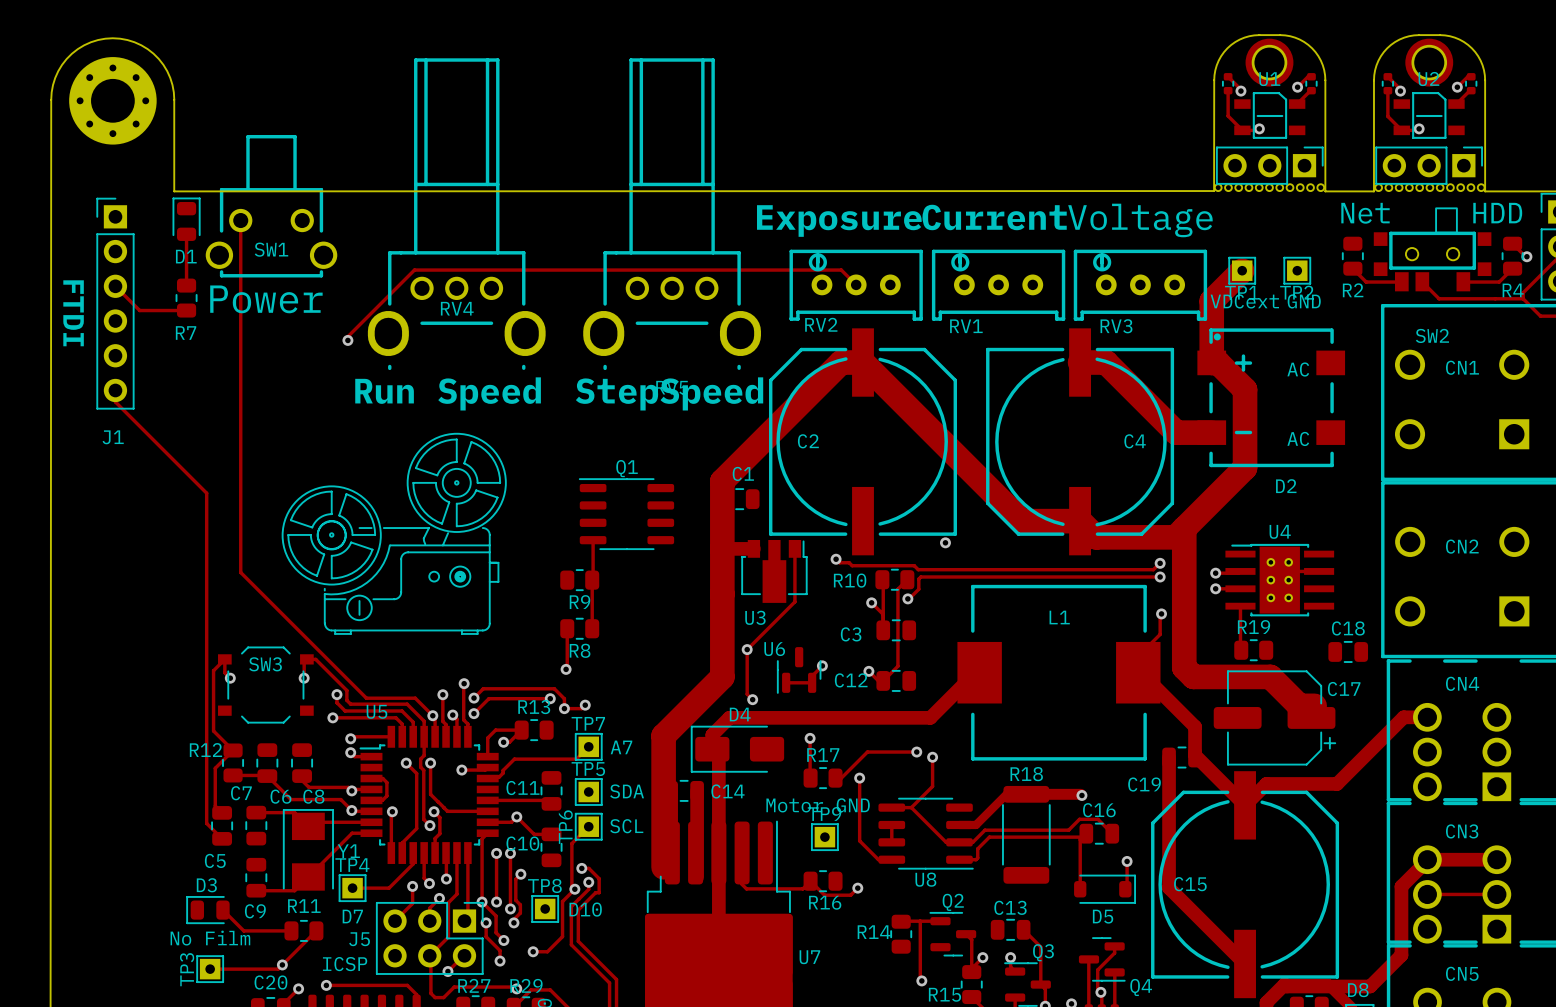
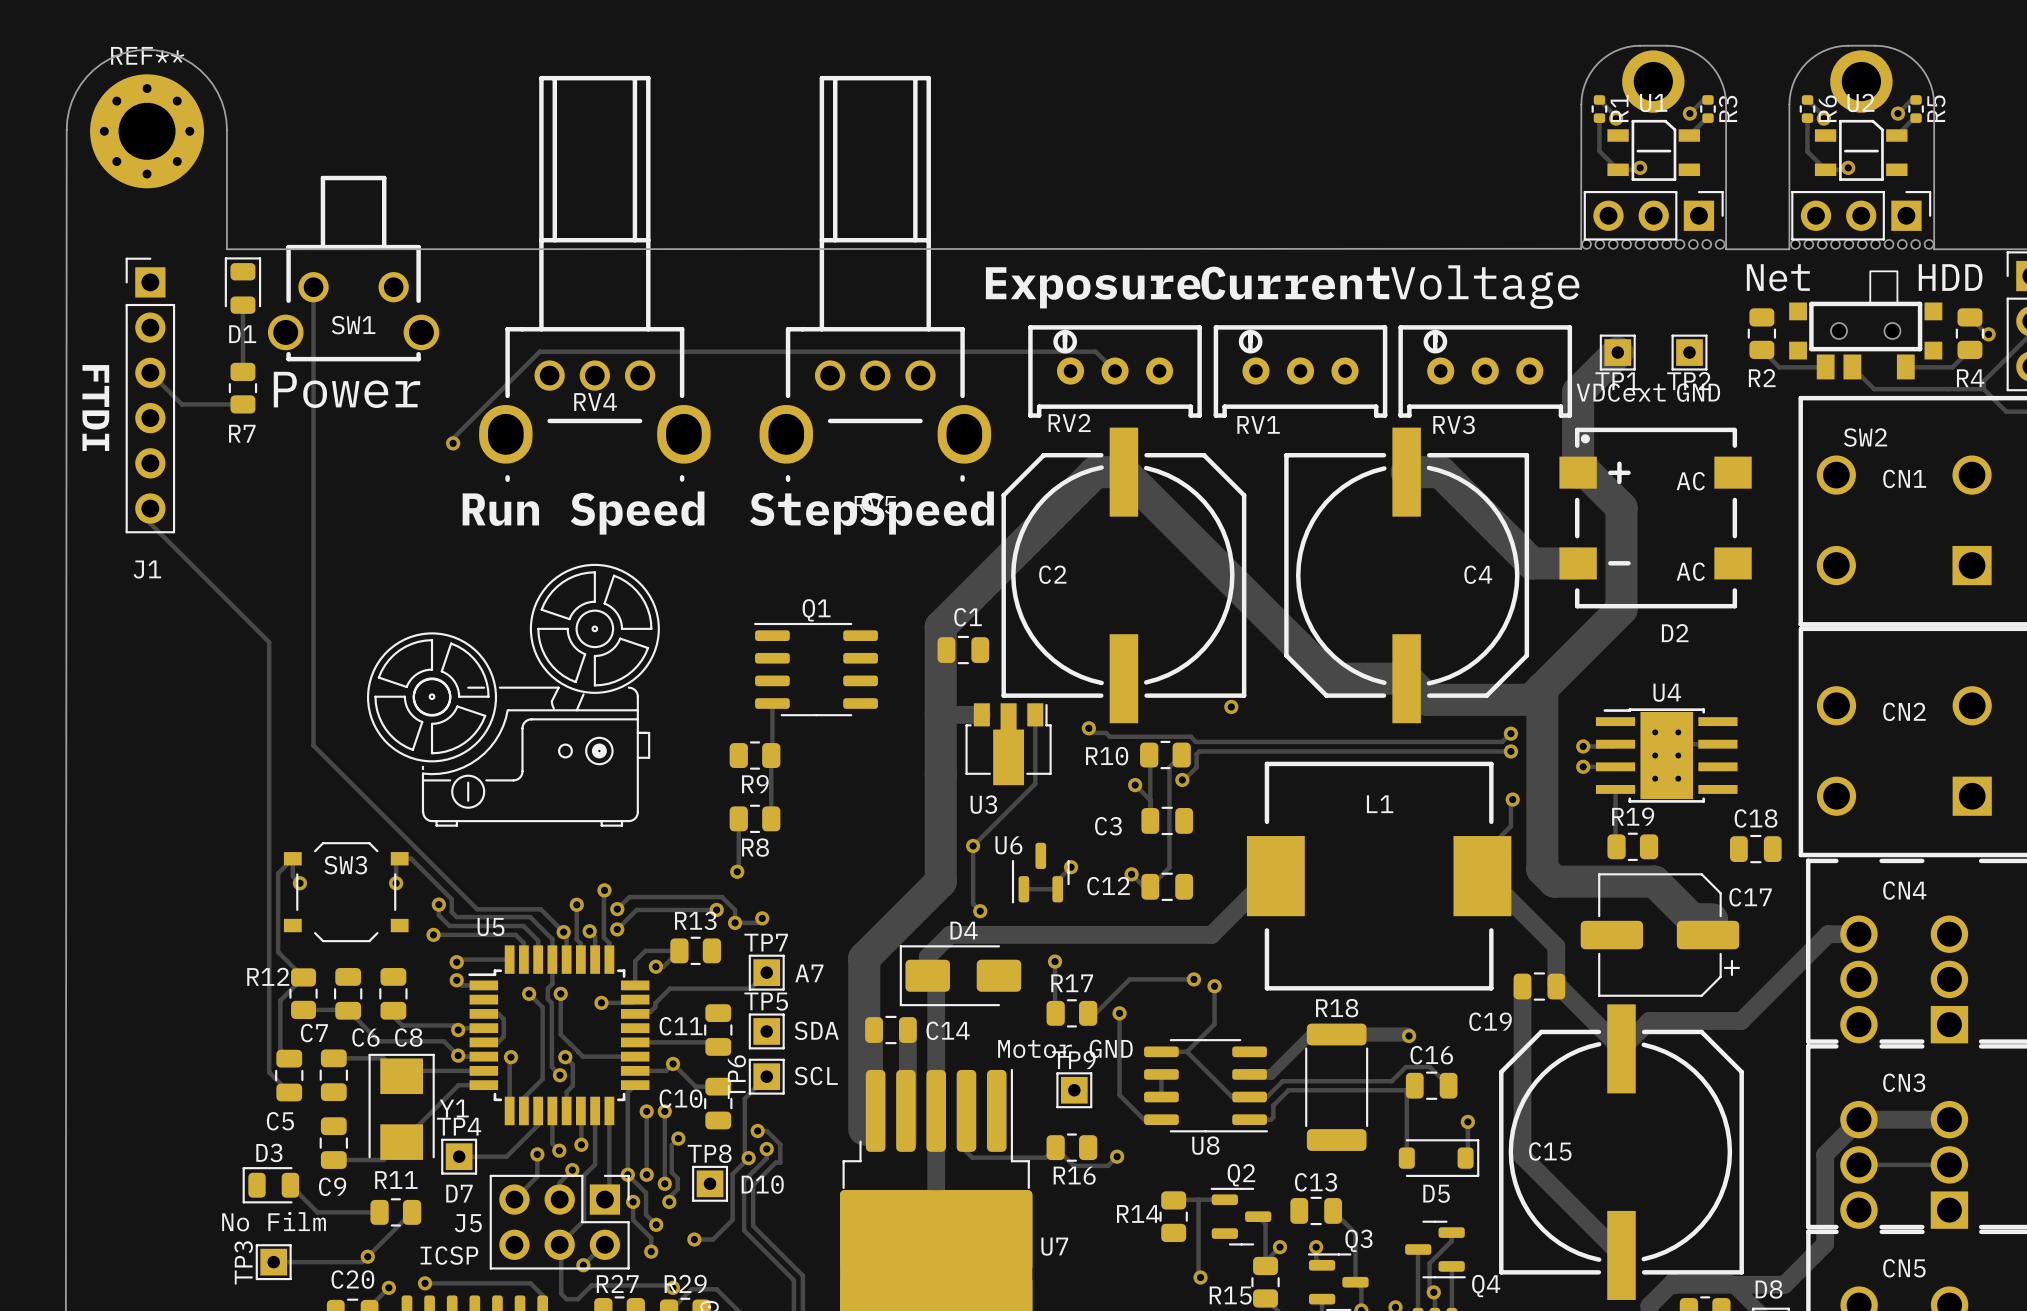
REF** name: none -> REF** (147, 55)
R1 name: none -> R1 (1619, 108)
R3 name: none -> R3 (1728, 108)
R6 name: none -> R6 (1827, 108)
R5 name: none -> R5 (1936, 108)

